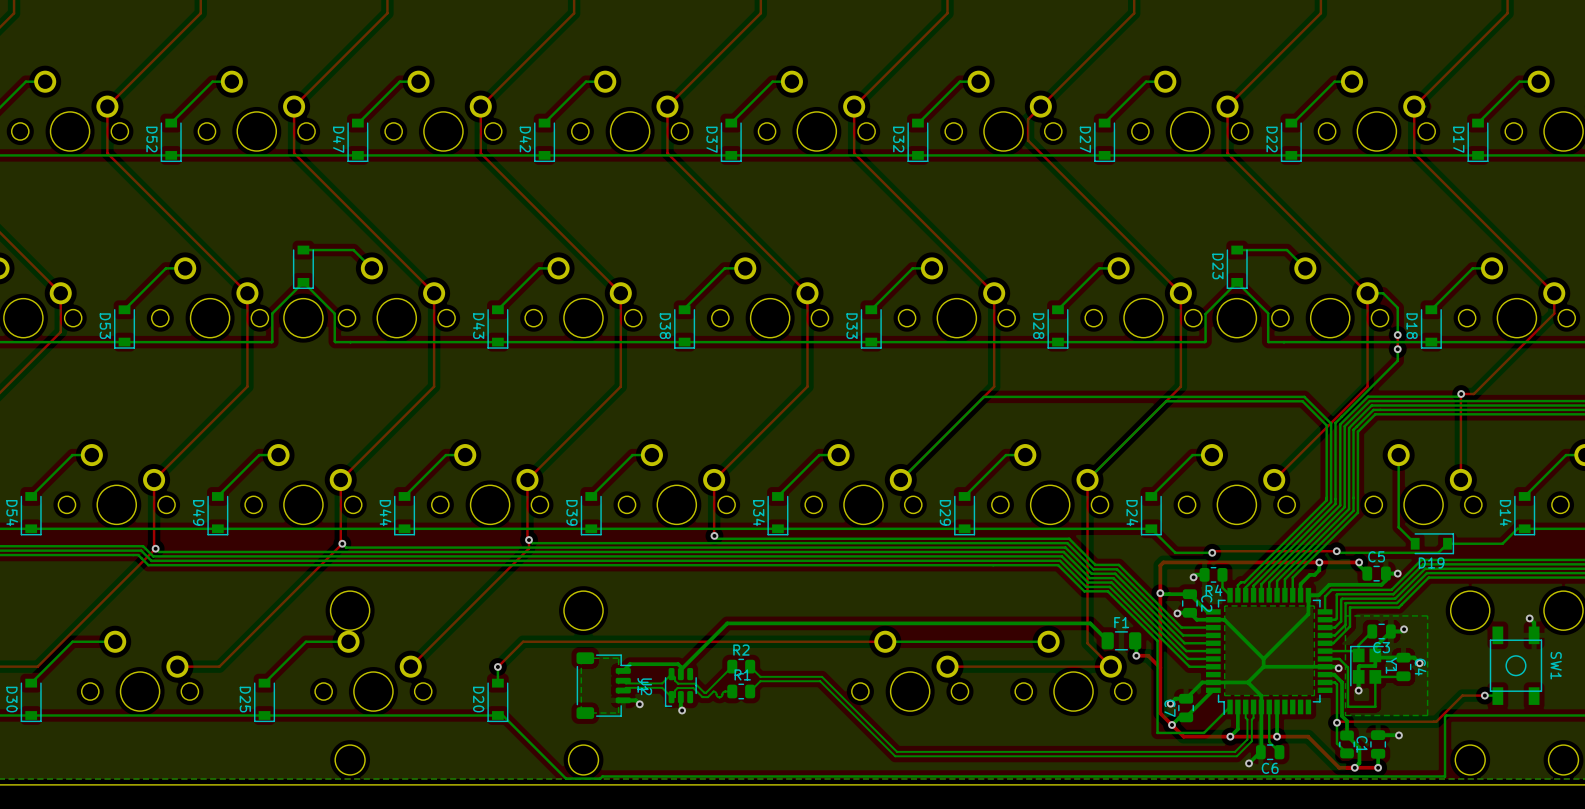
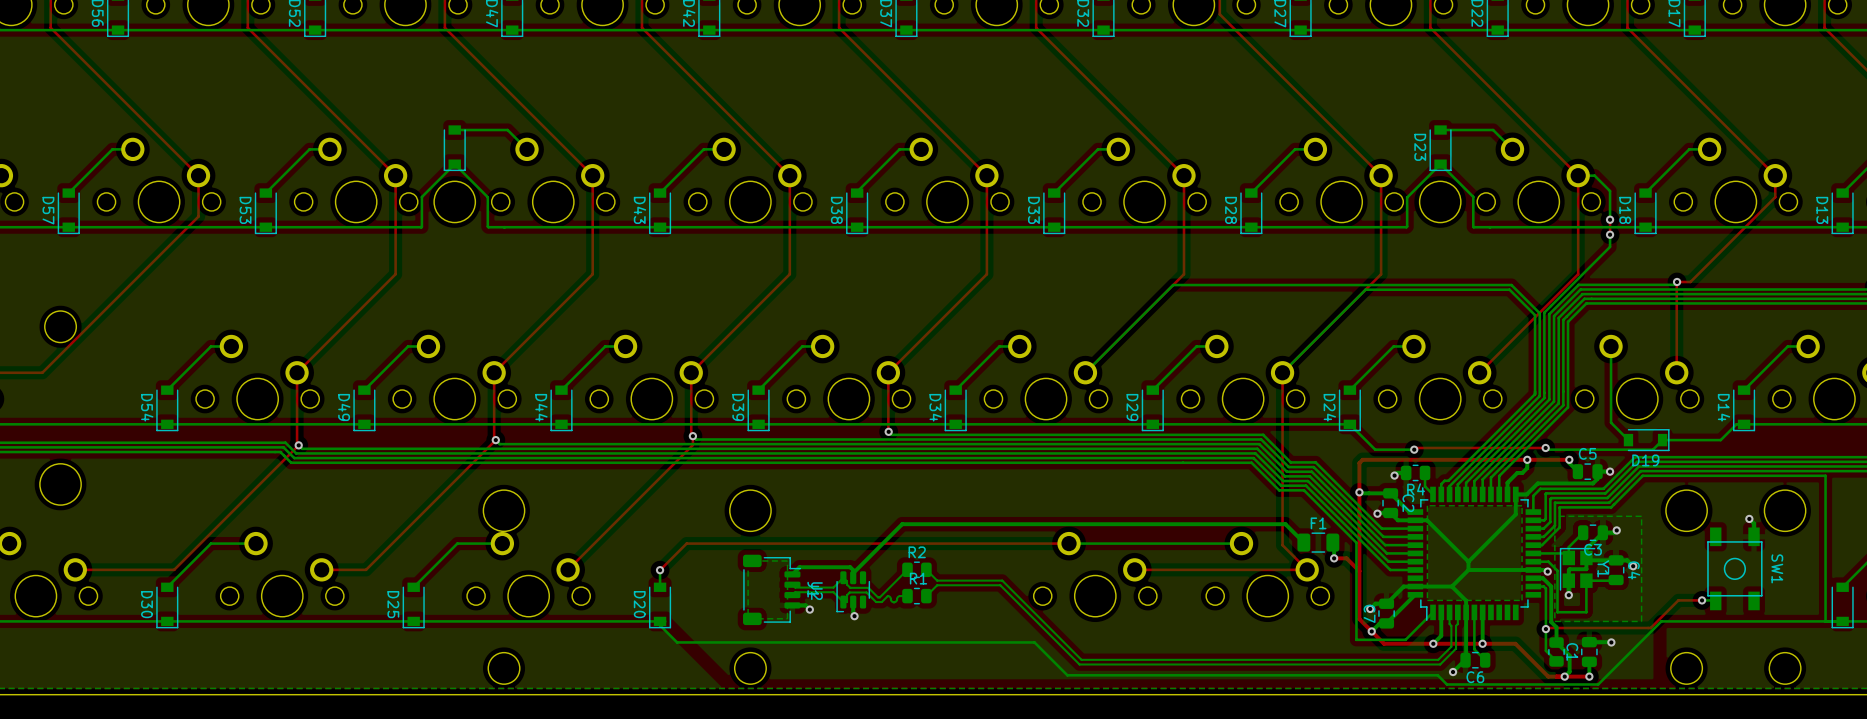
bottom track: (502, 715) (565, 778) (600, 778) (602, 776) (1445, 776) (1445, 716) -> (660, 621) (660, 625) (677, 642) (1034, 642) (1067, 675) (1437, 675) (1446, 684) (1598, 684) (1659, 622)

